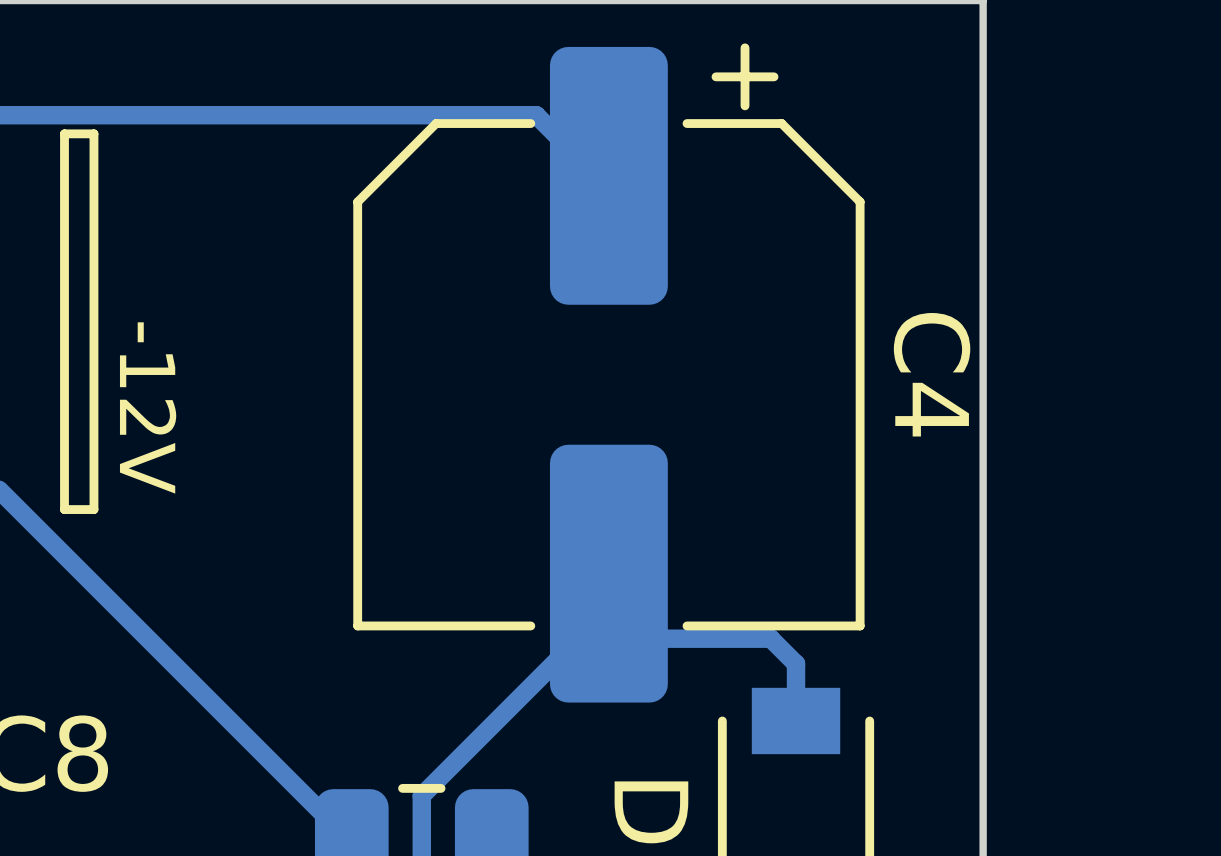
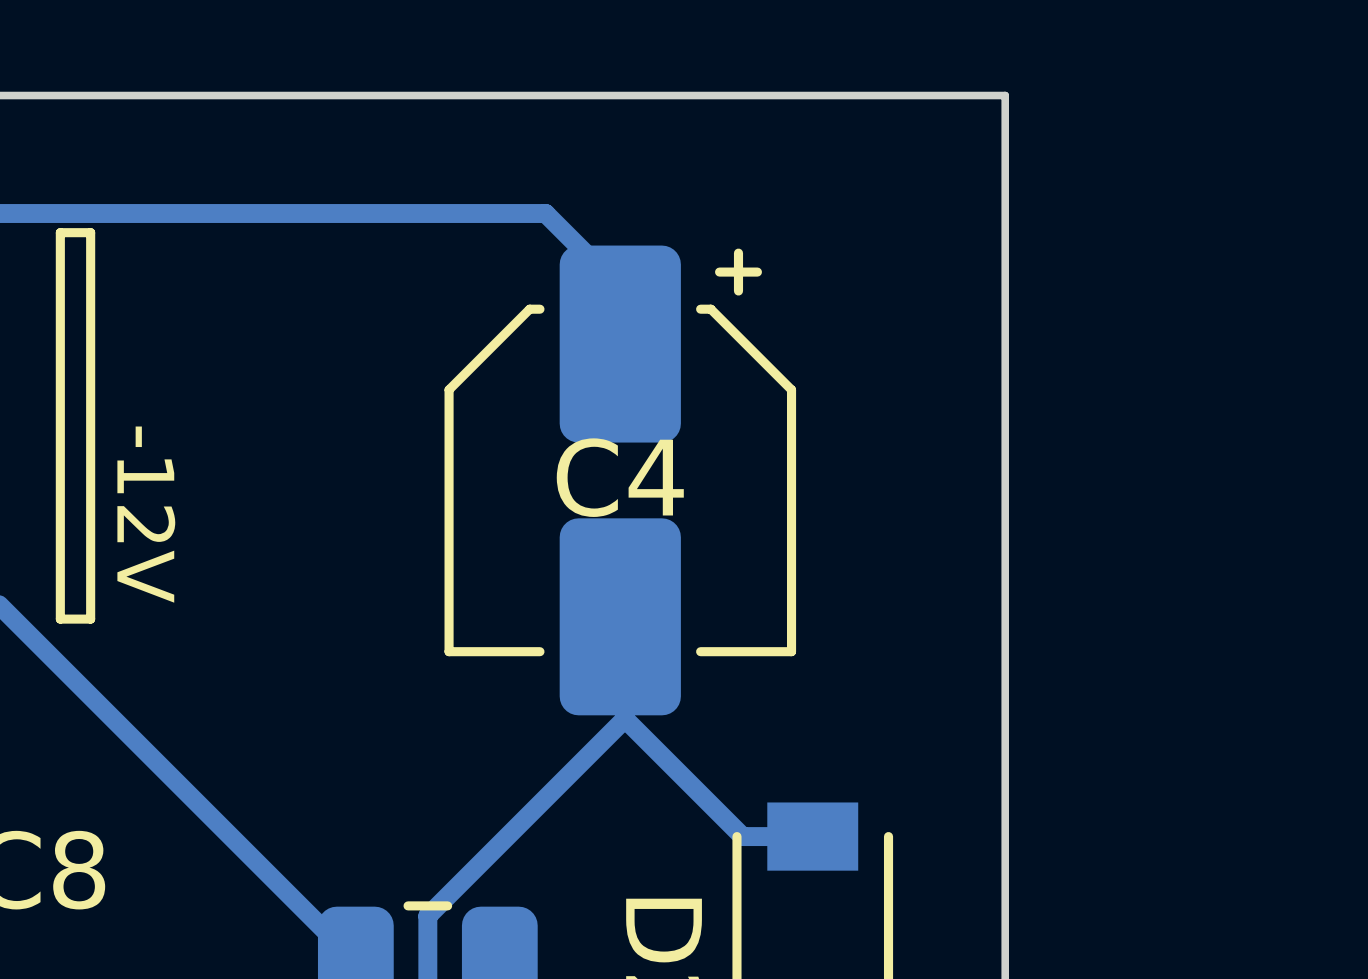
C4 footprint: [353, 43, 865, 703] -> [444, 245, 797, 716]
C4 name position: C4 (932, 374) -> C4 (620, 477)
track: none -> (625, 718) (742, 836) (812, 836)
track: (796, 720) (796, 663) (770, 638) (578, 638) (421, 795) (421, 798) -> (625, 718) (427, 916)

